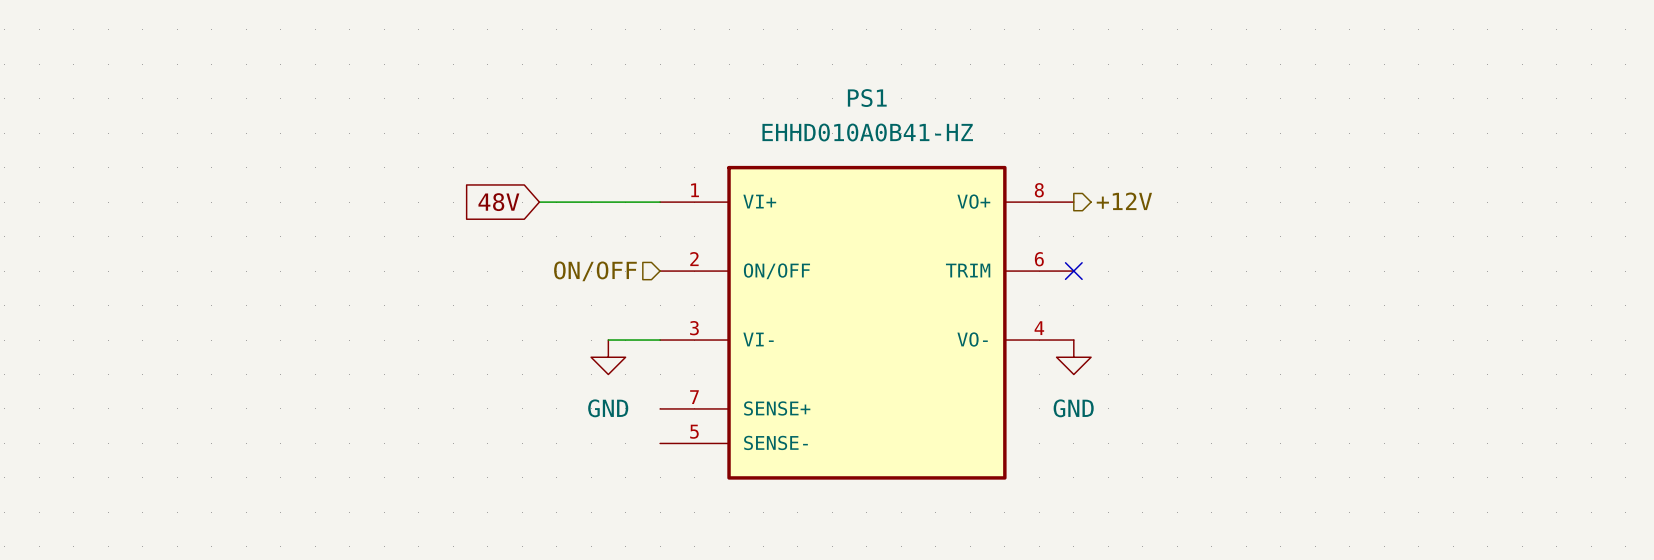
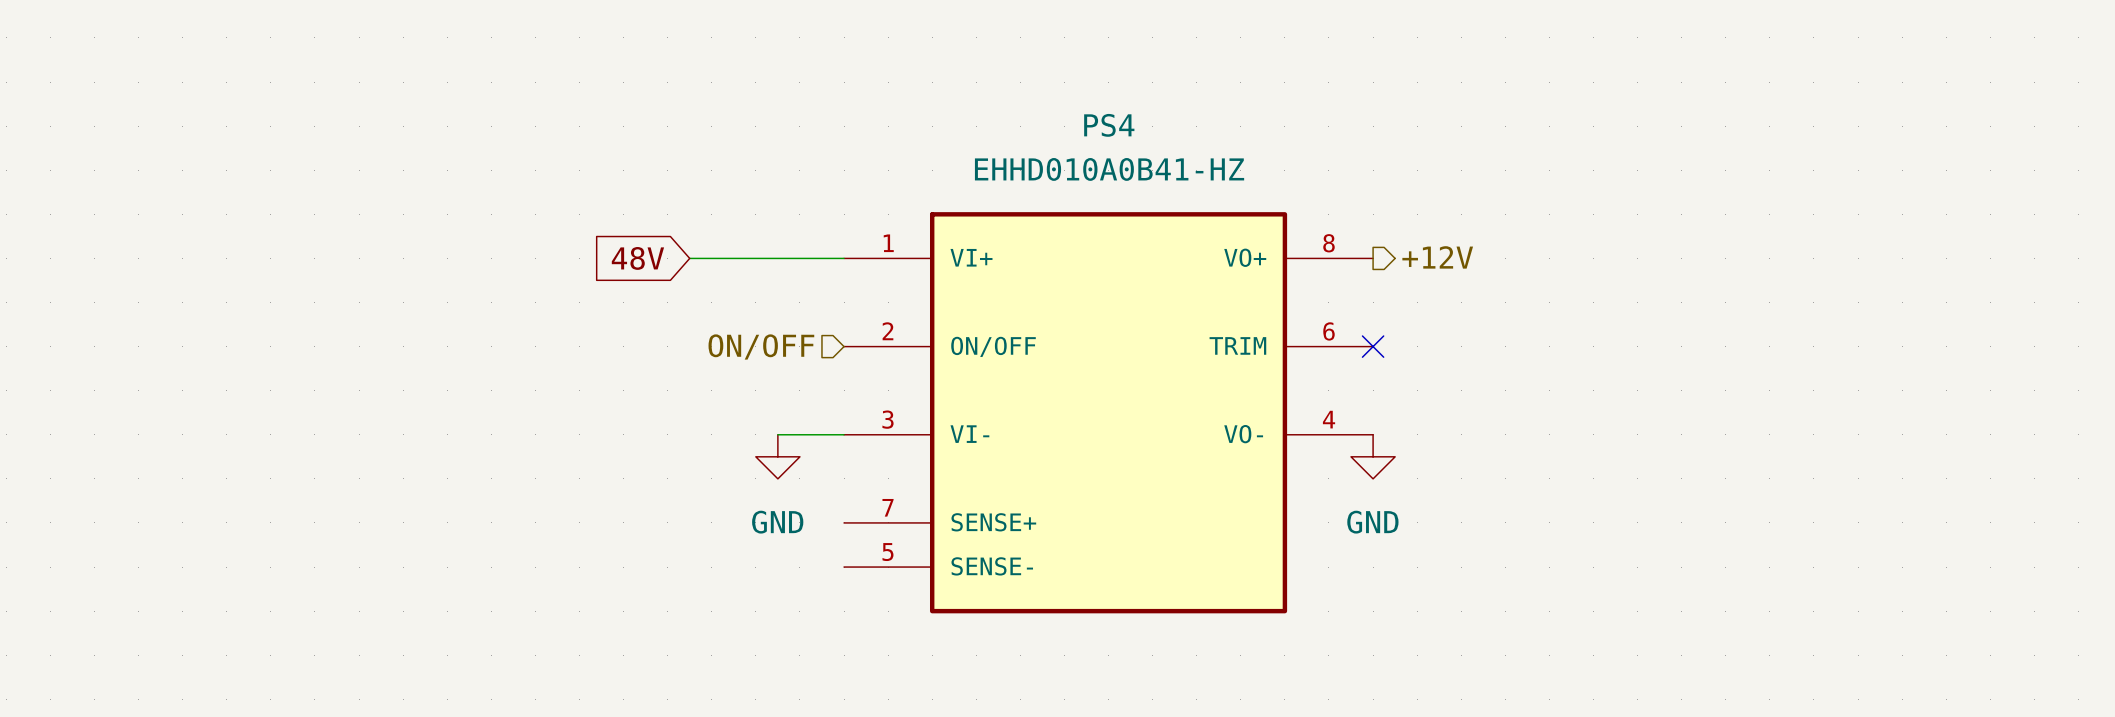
PS1 name: PS1 (867, 98) -> PS4 (1109, 125)

